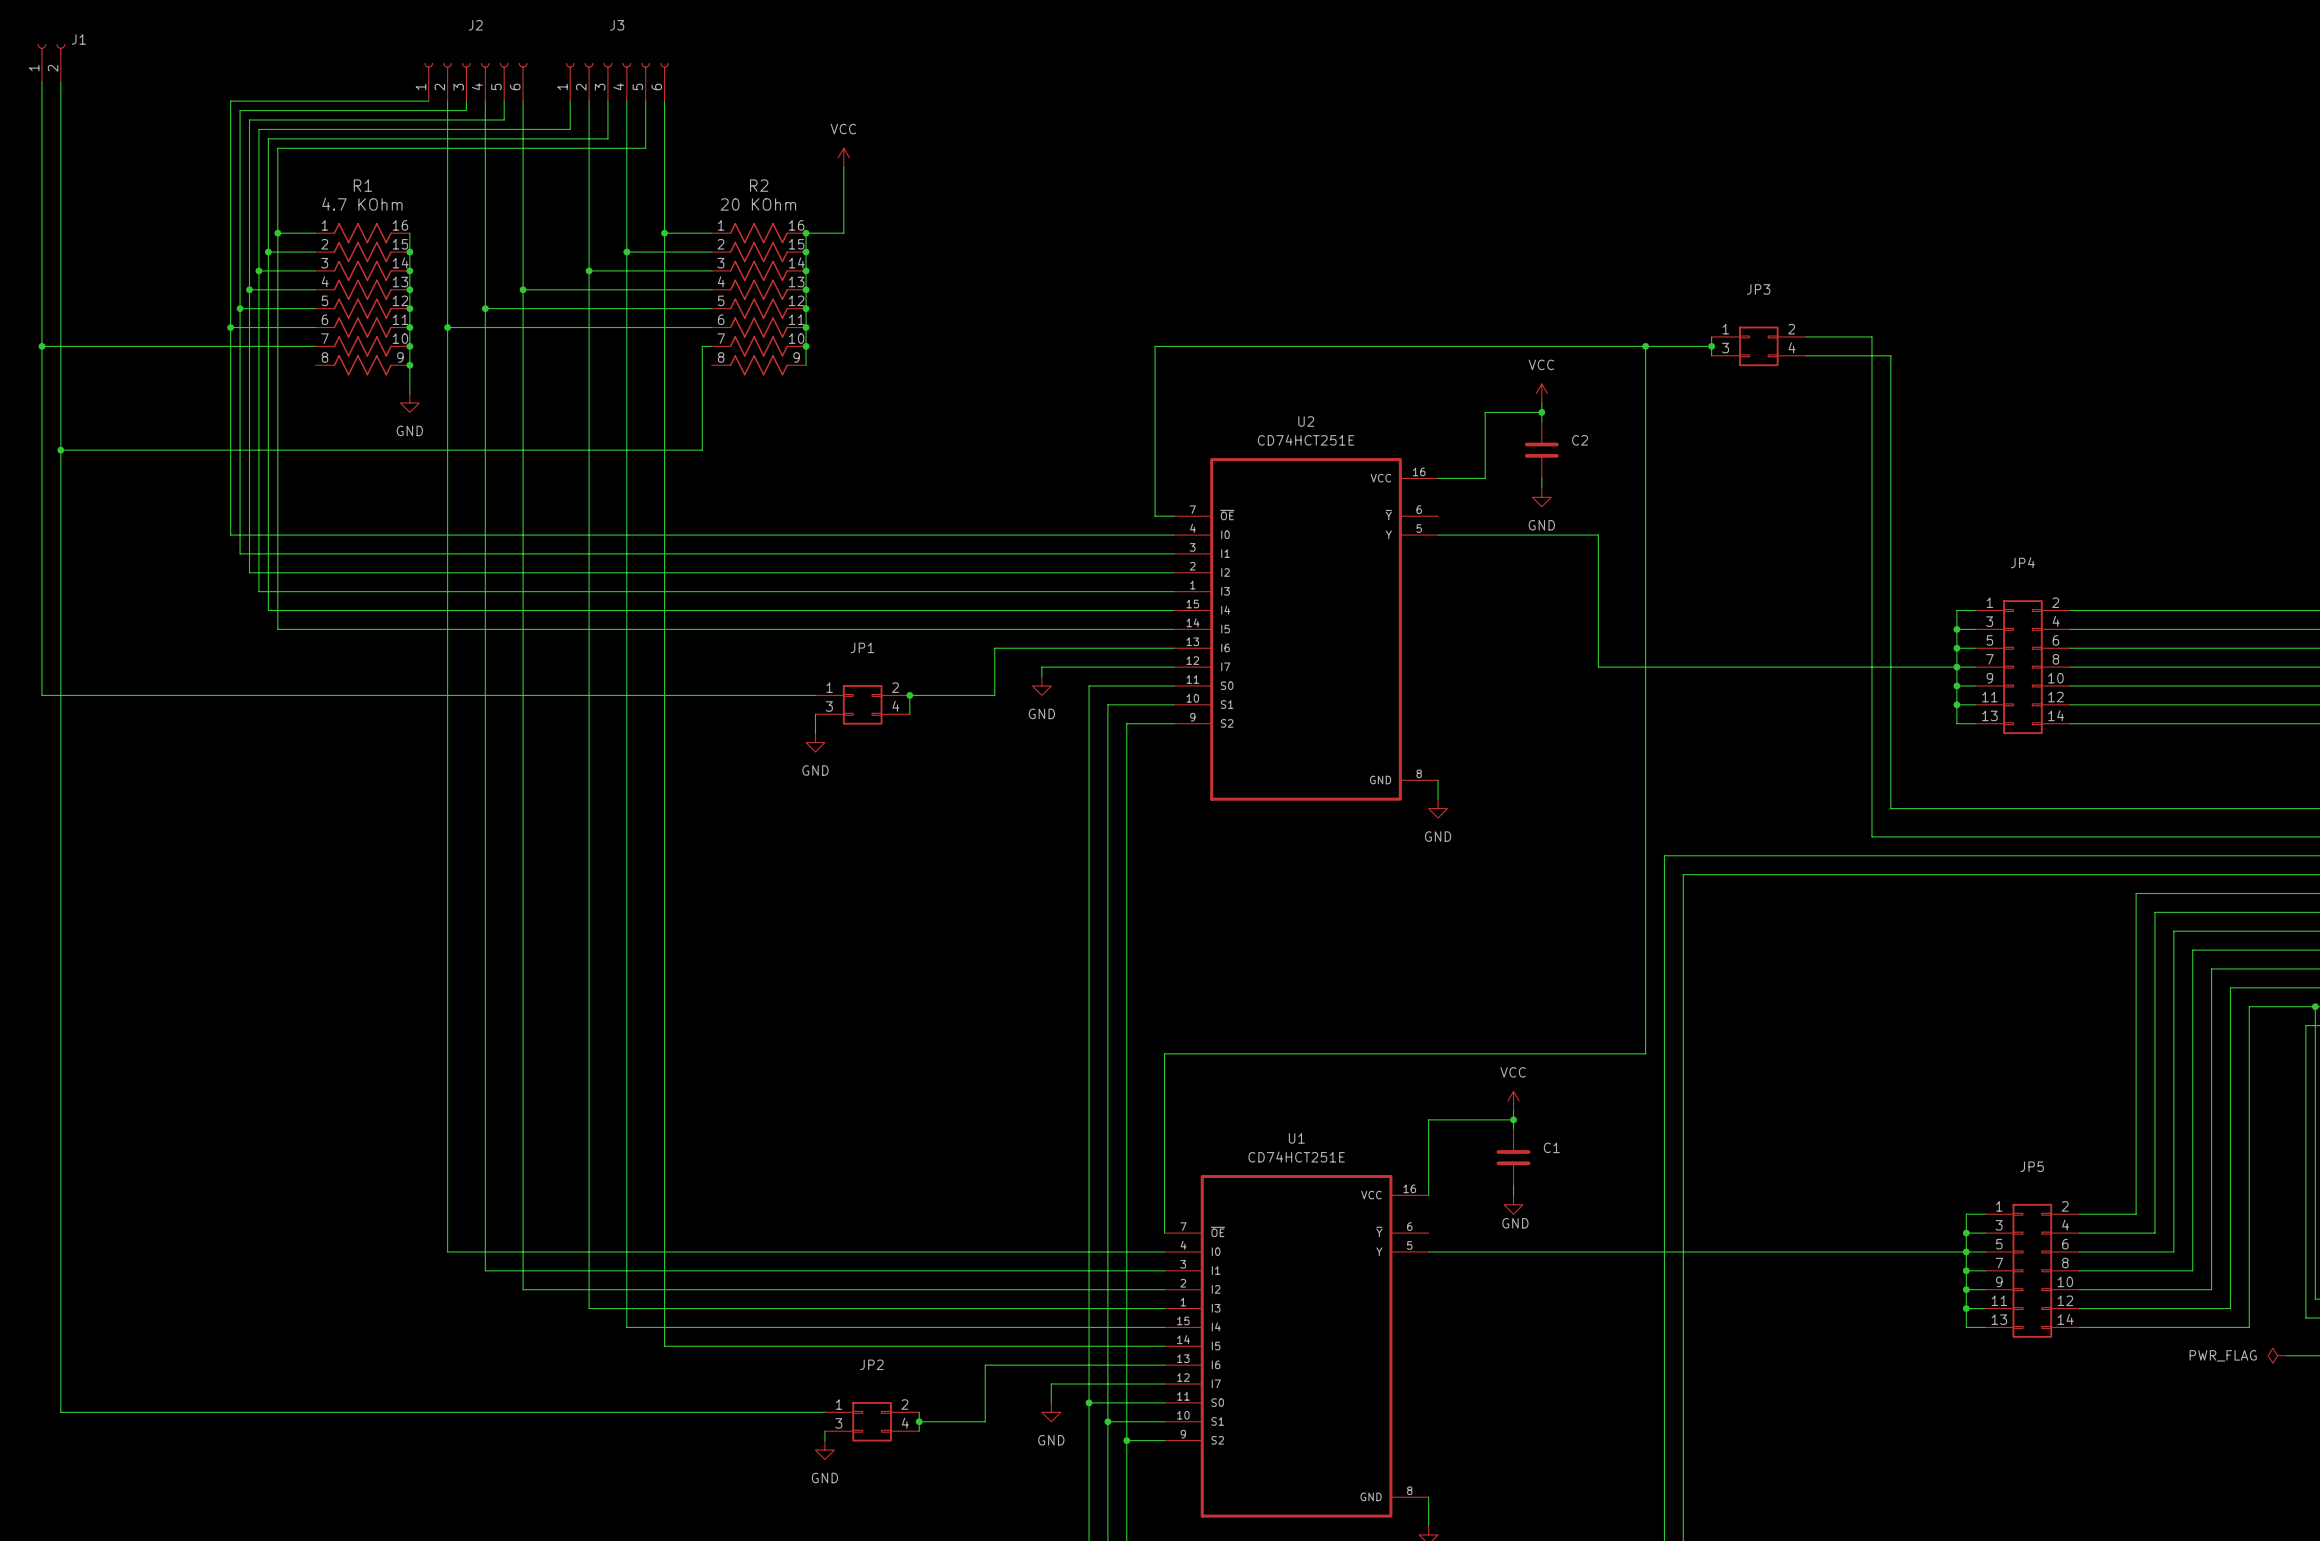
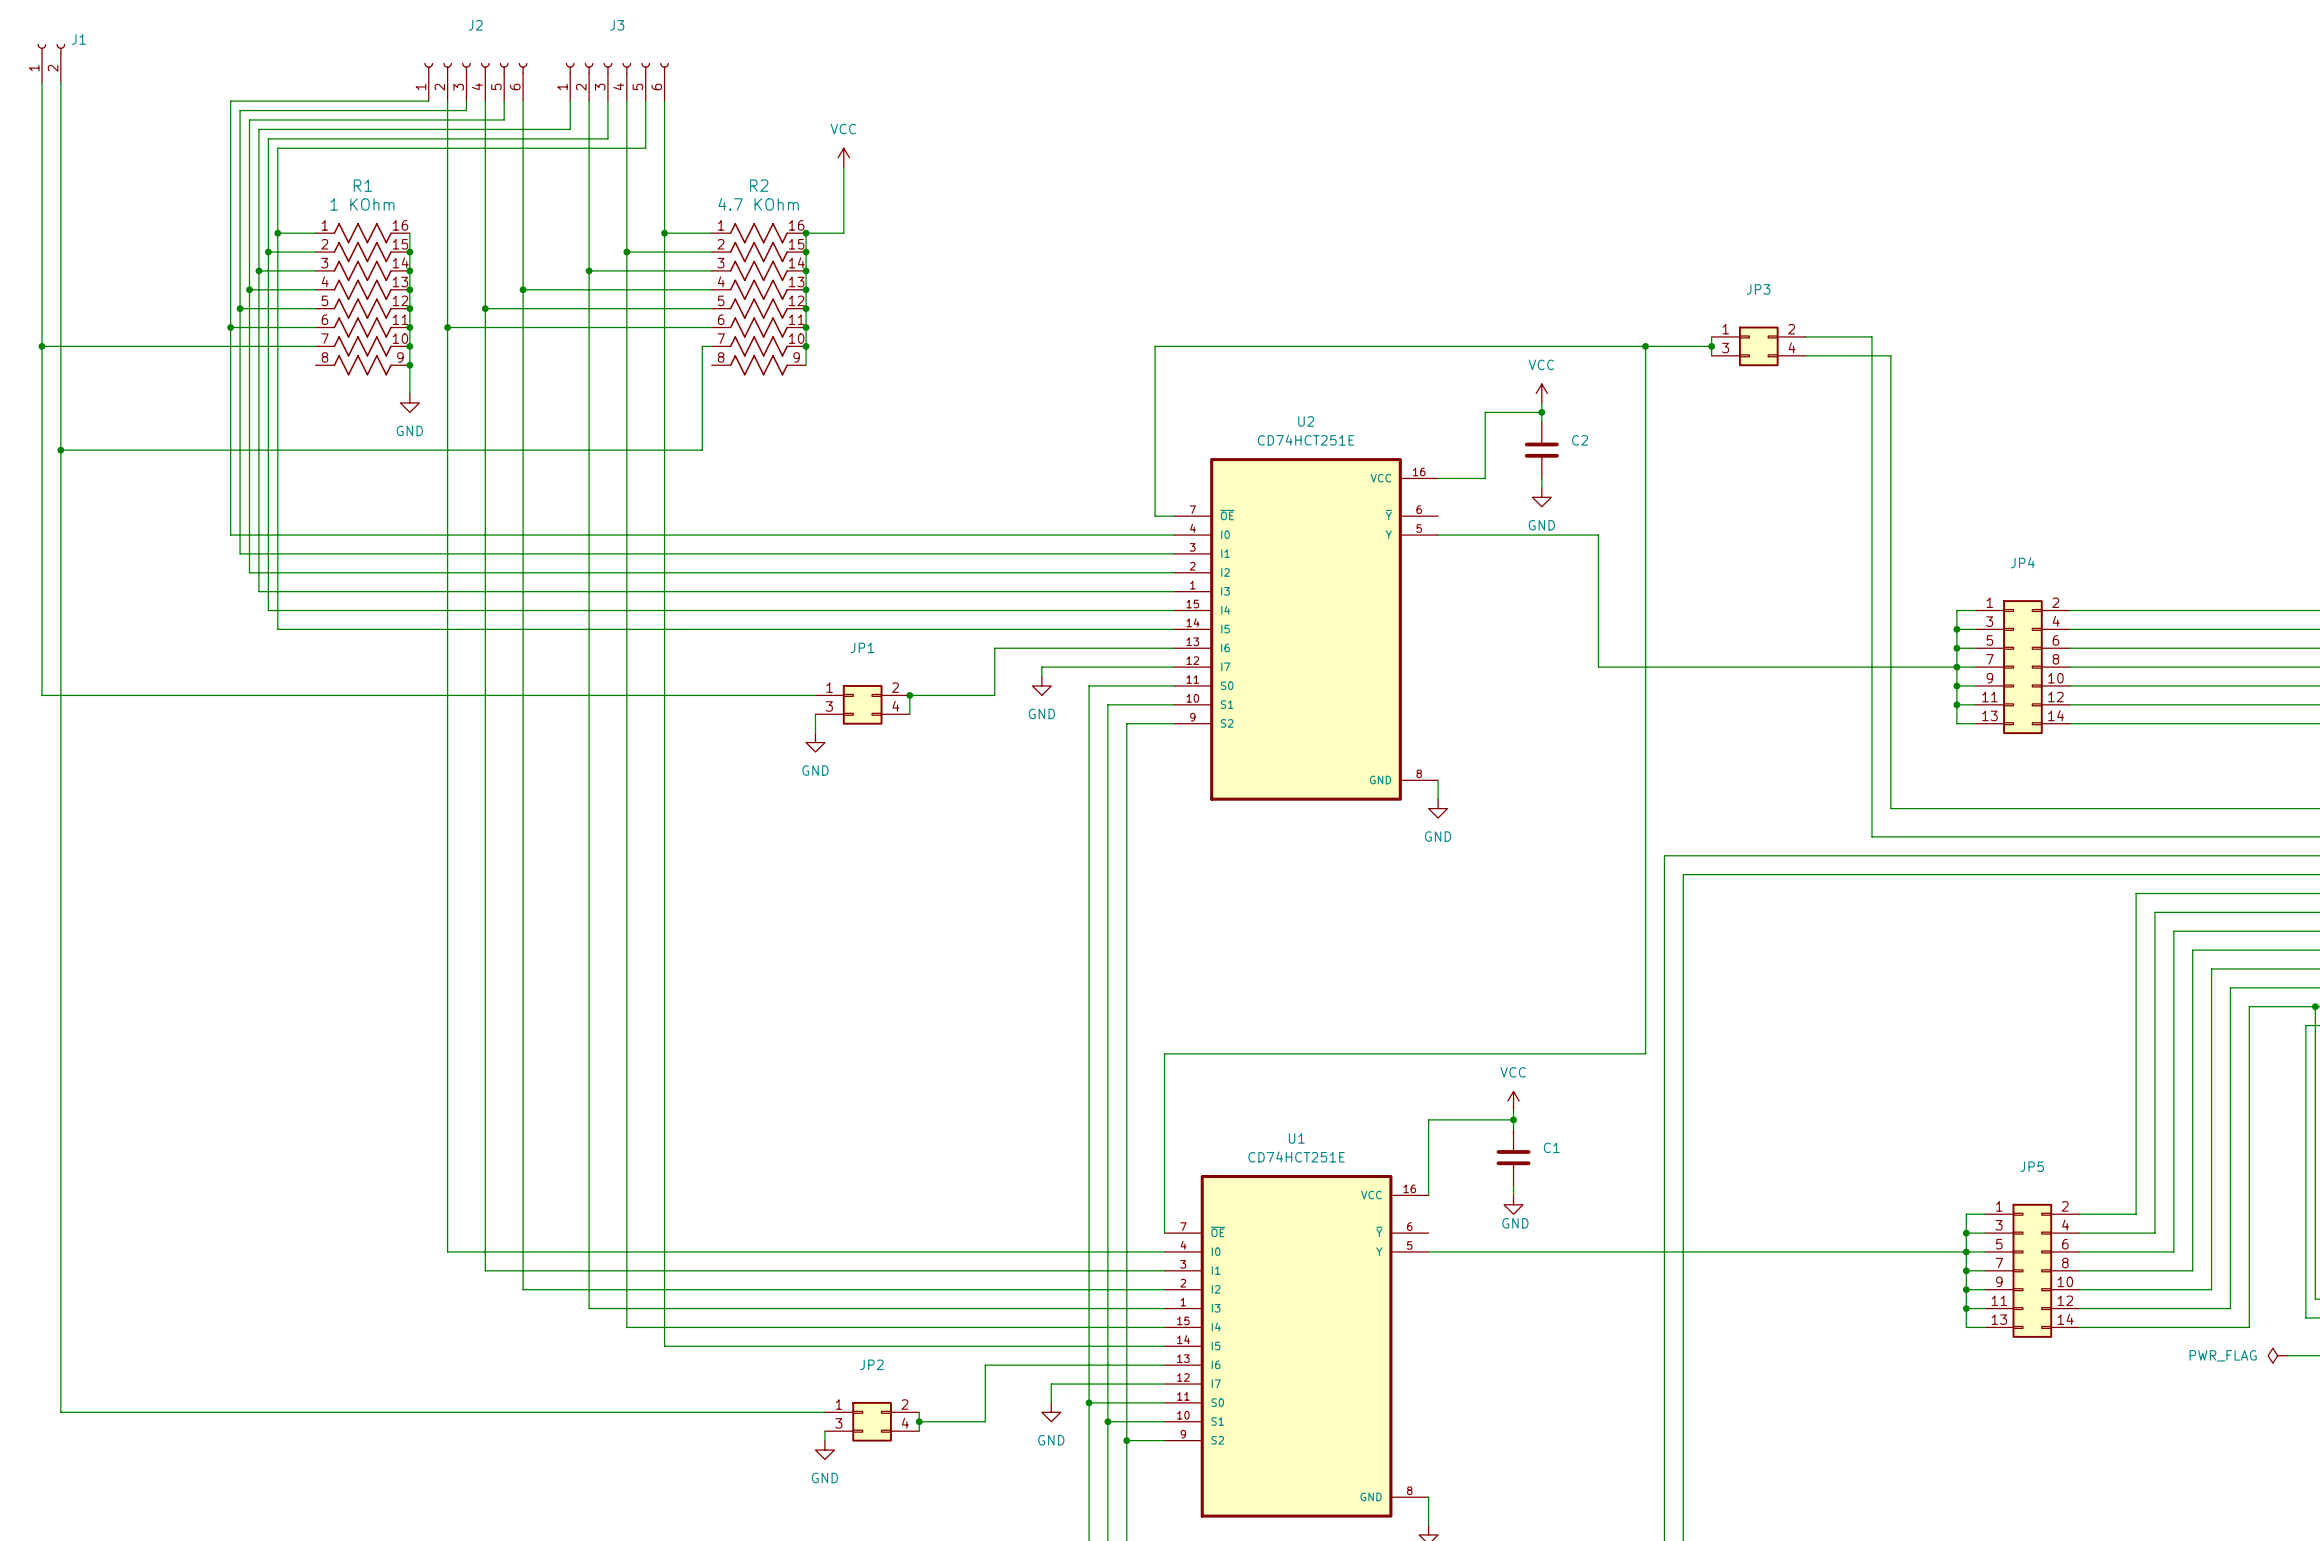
R1 value: 4.7 KOhm (362, 204) -> 1 KOhm (362, 204)
R2 value: 20 KOhm (758, 204) -> 4.7 KOhm (758, 204)

